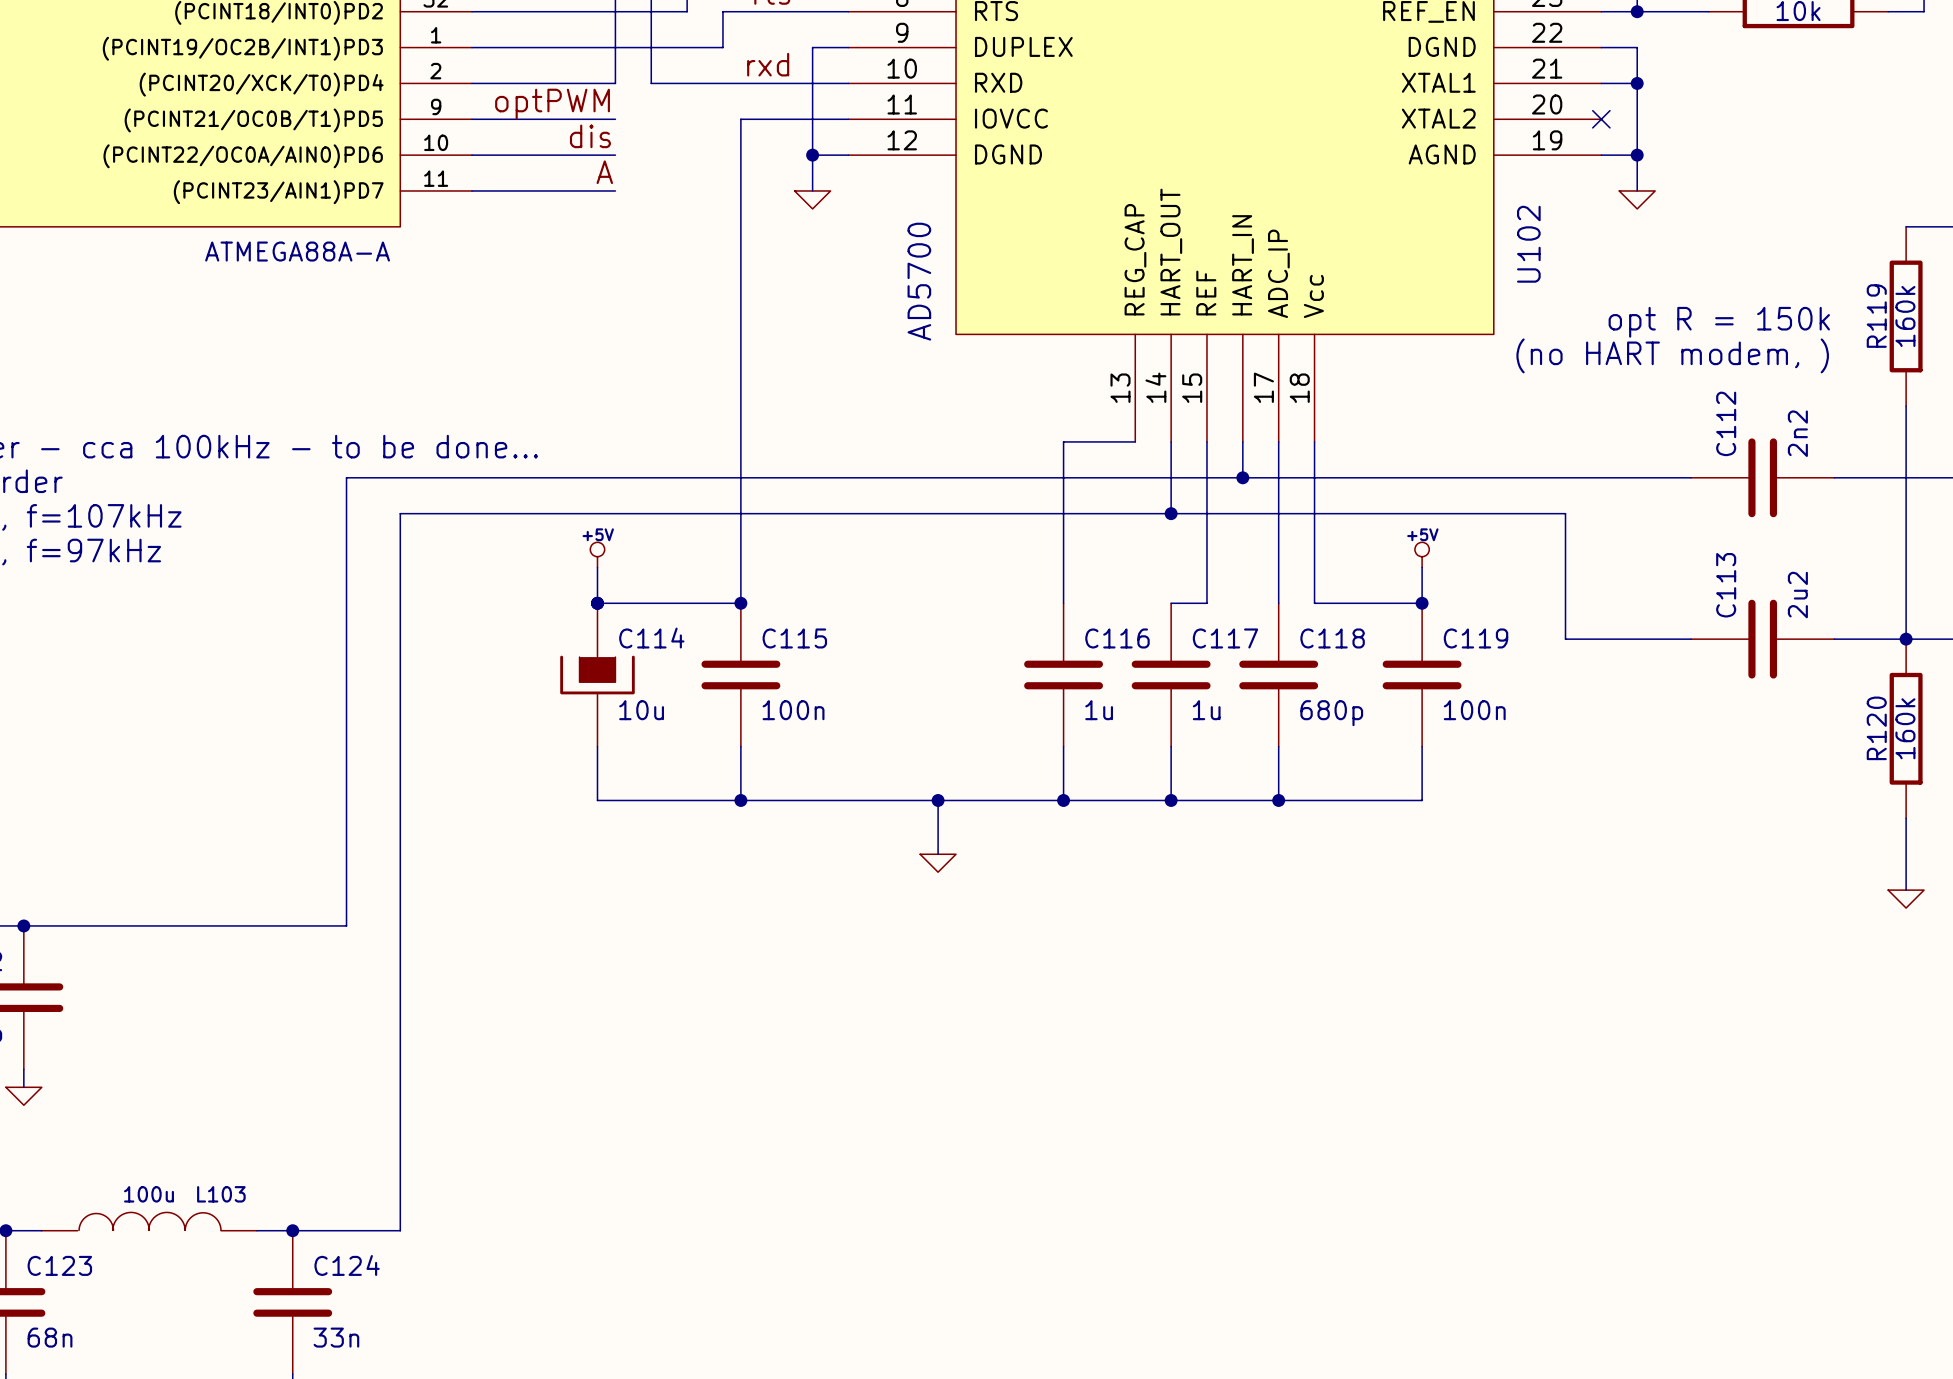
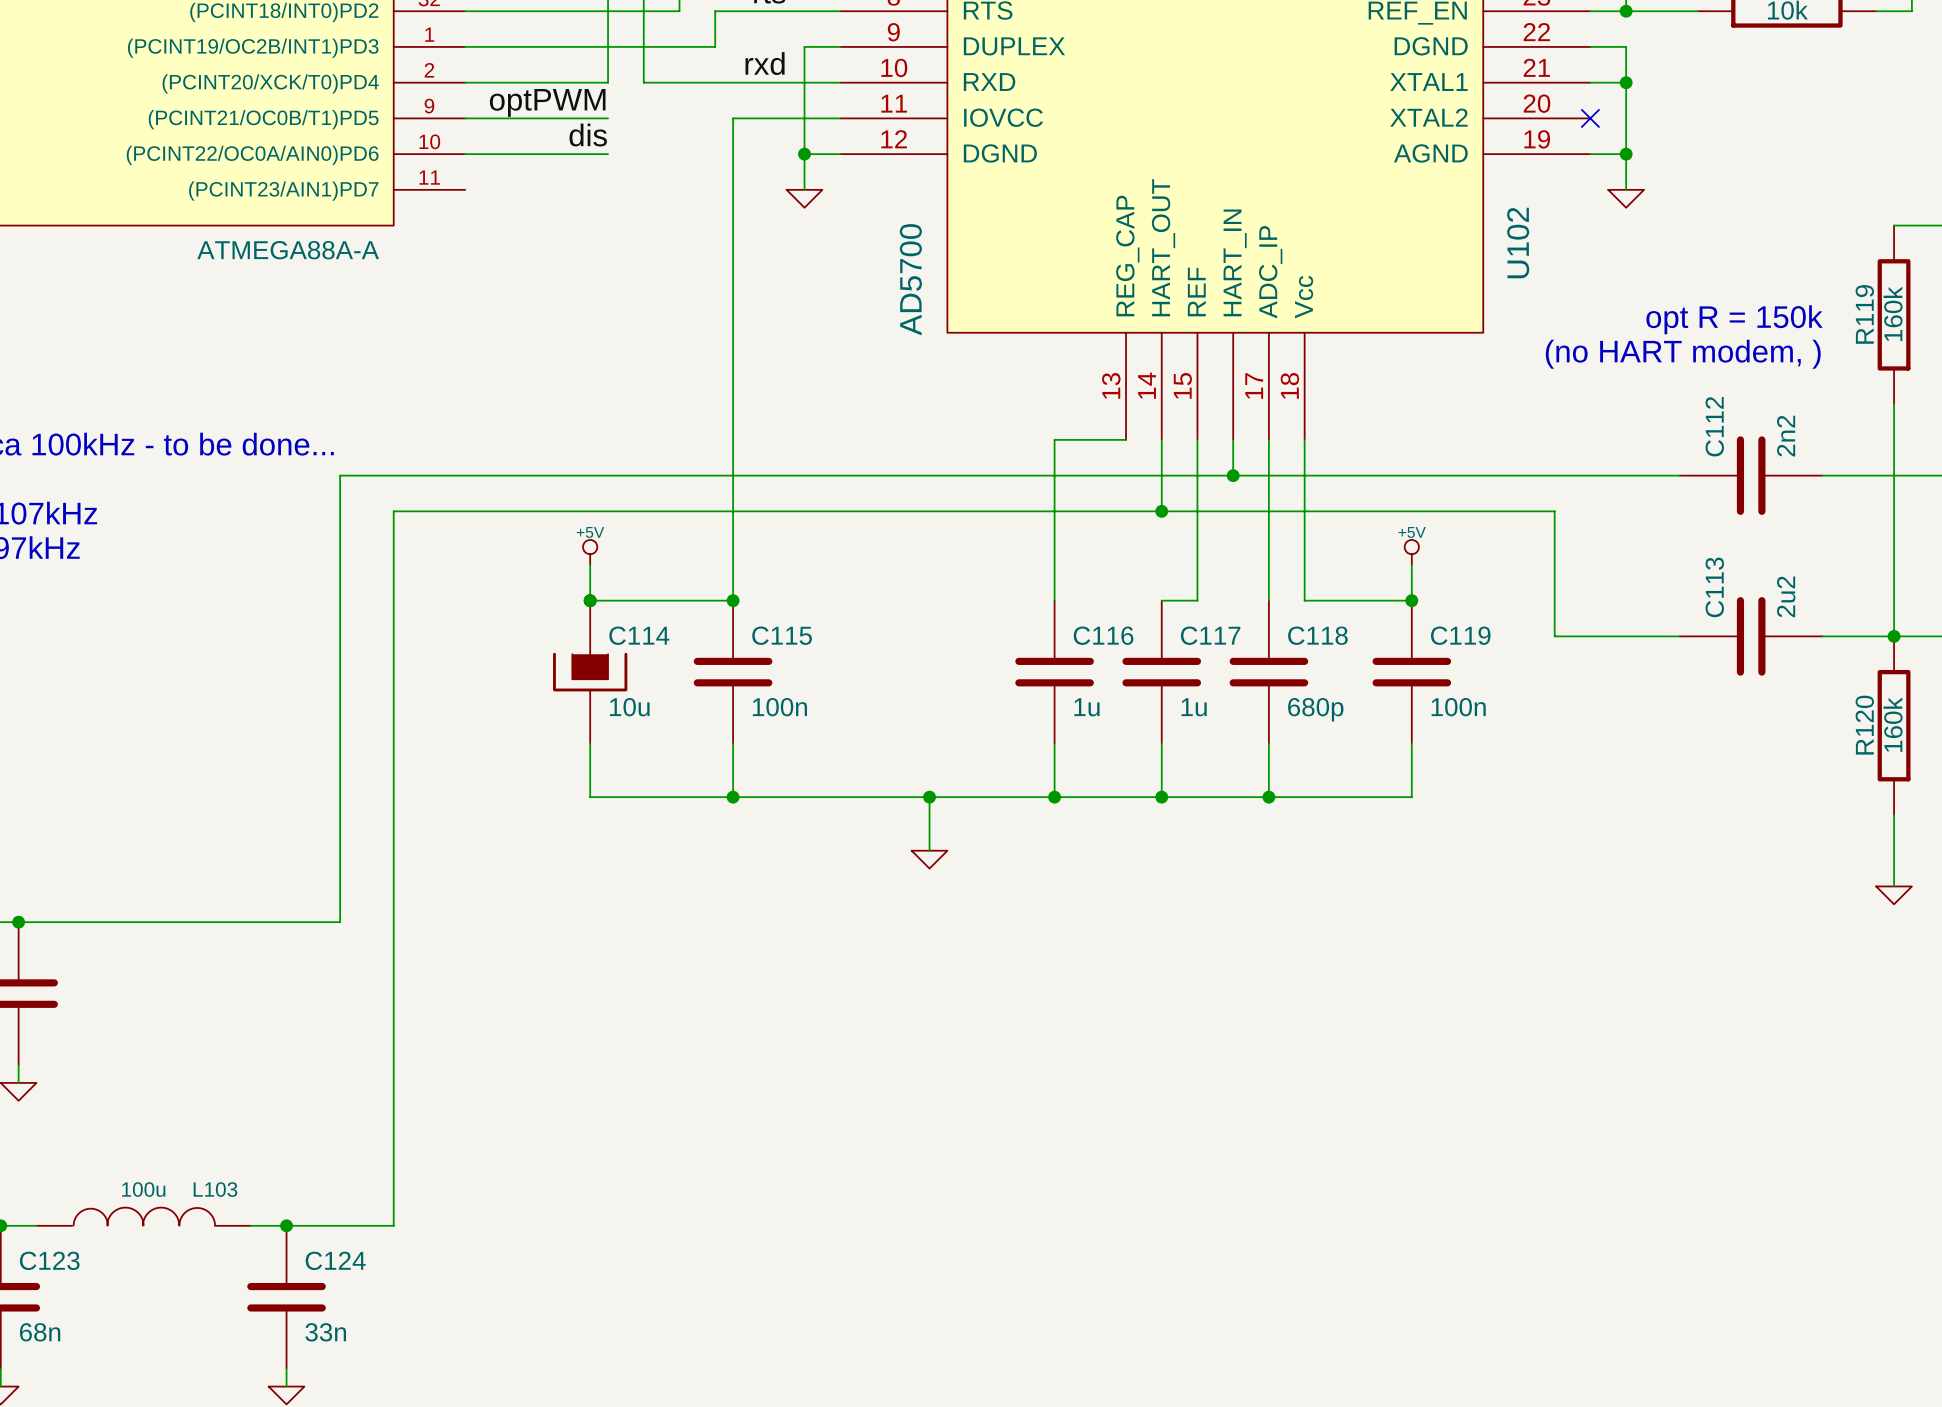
label: A (604, 172) -> none
wire: (472, 190) (615, 190) -> none

